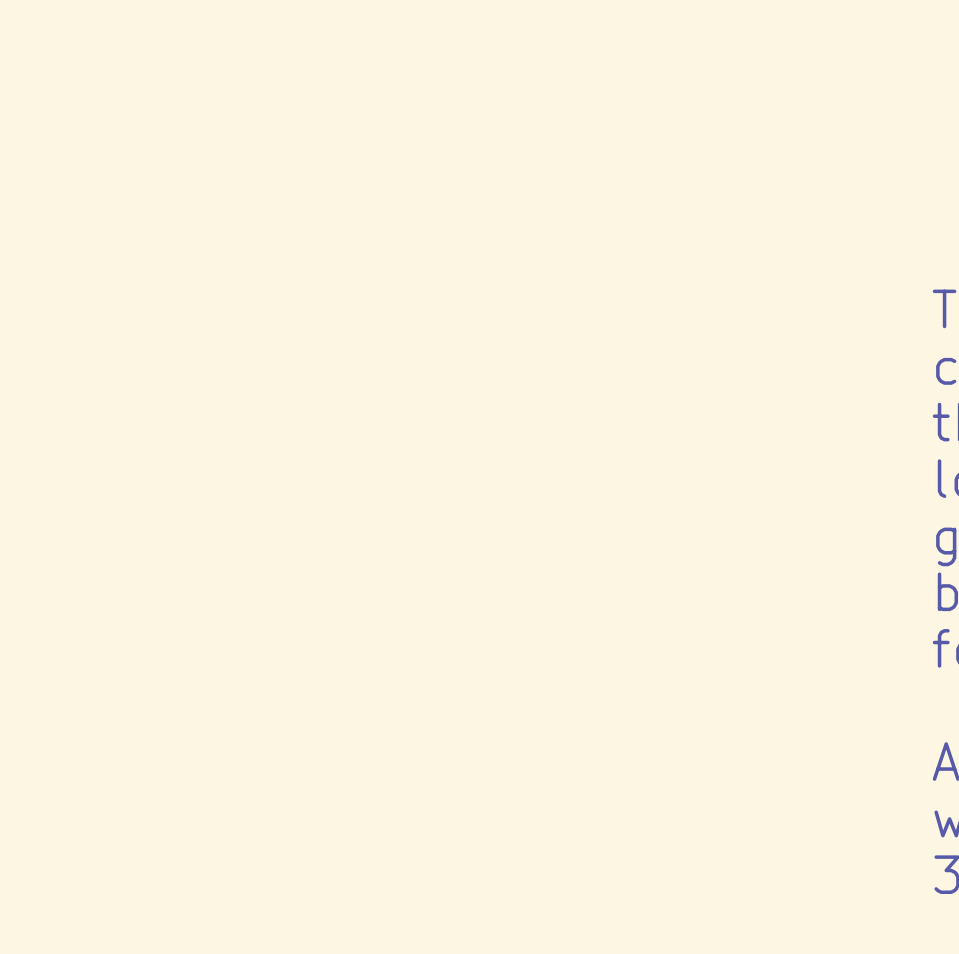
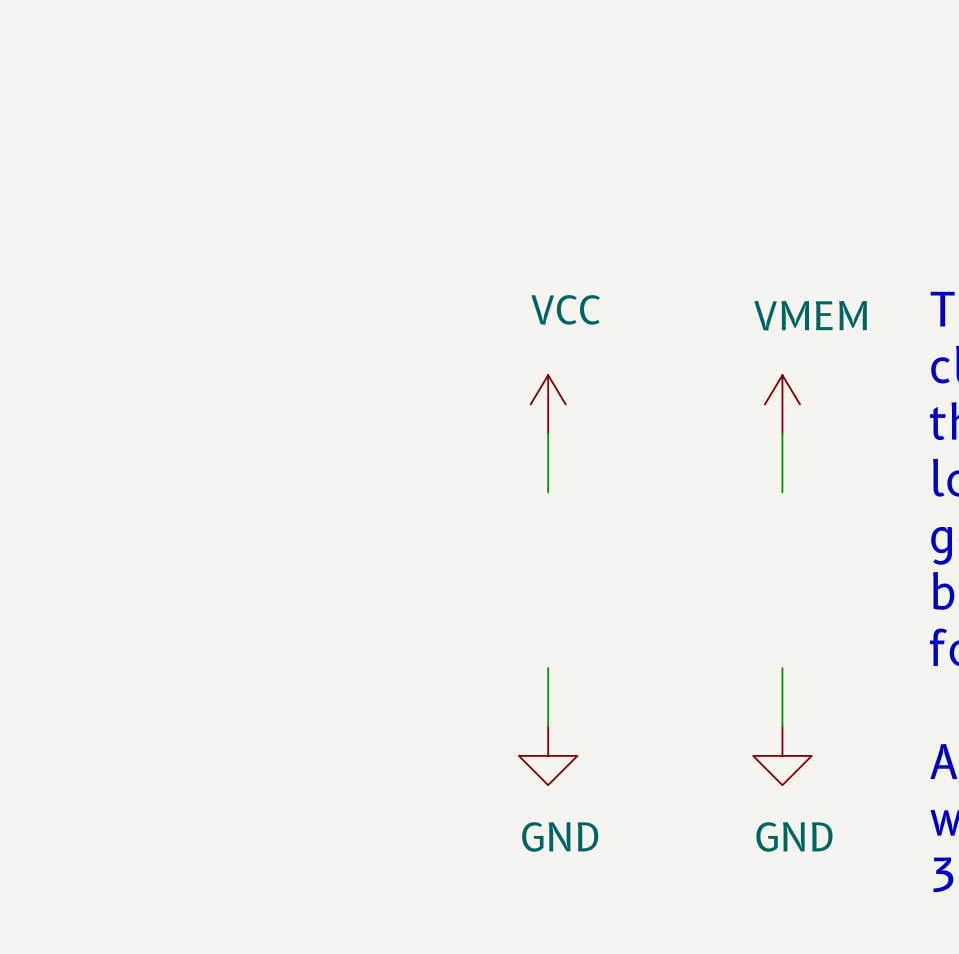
power symbol: none -> VCC (548, 404)
power symbol: none -> VMEM (782, 404)
wire: none -> (548, 433) (548, 492)
wire: none -> (782, 433) (782, 492)
wire: none -> (548, 668) (548, 726)
wire: none -> (782, 668) (782, 726)
power symbol: none -> GND (548, 755)
power symbol: none -> GND (782, 755)

